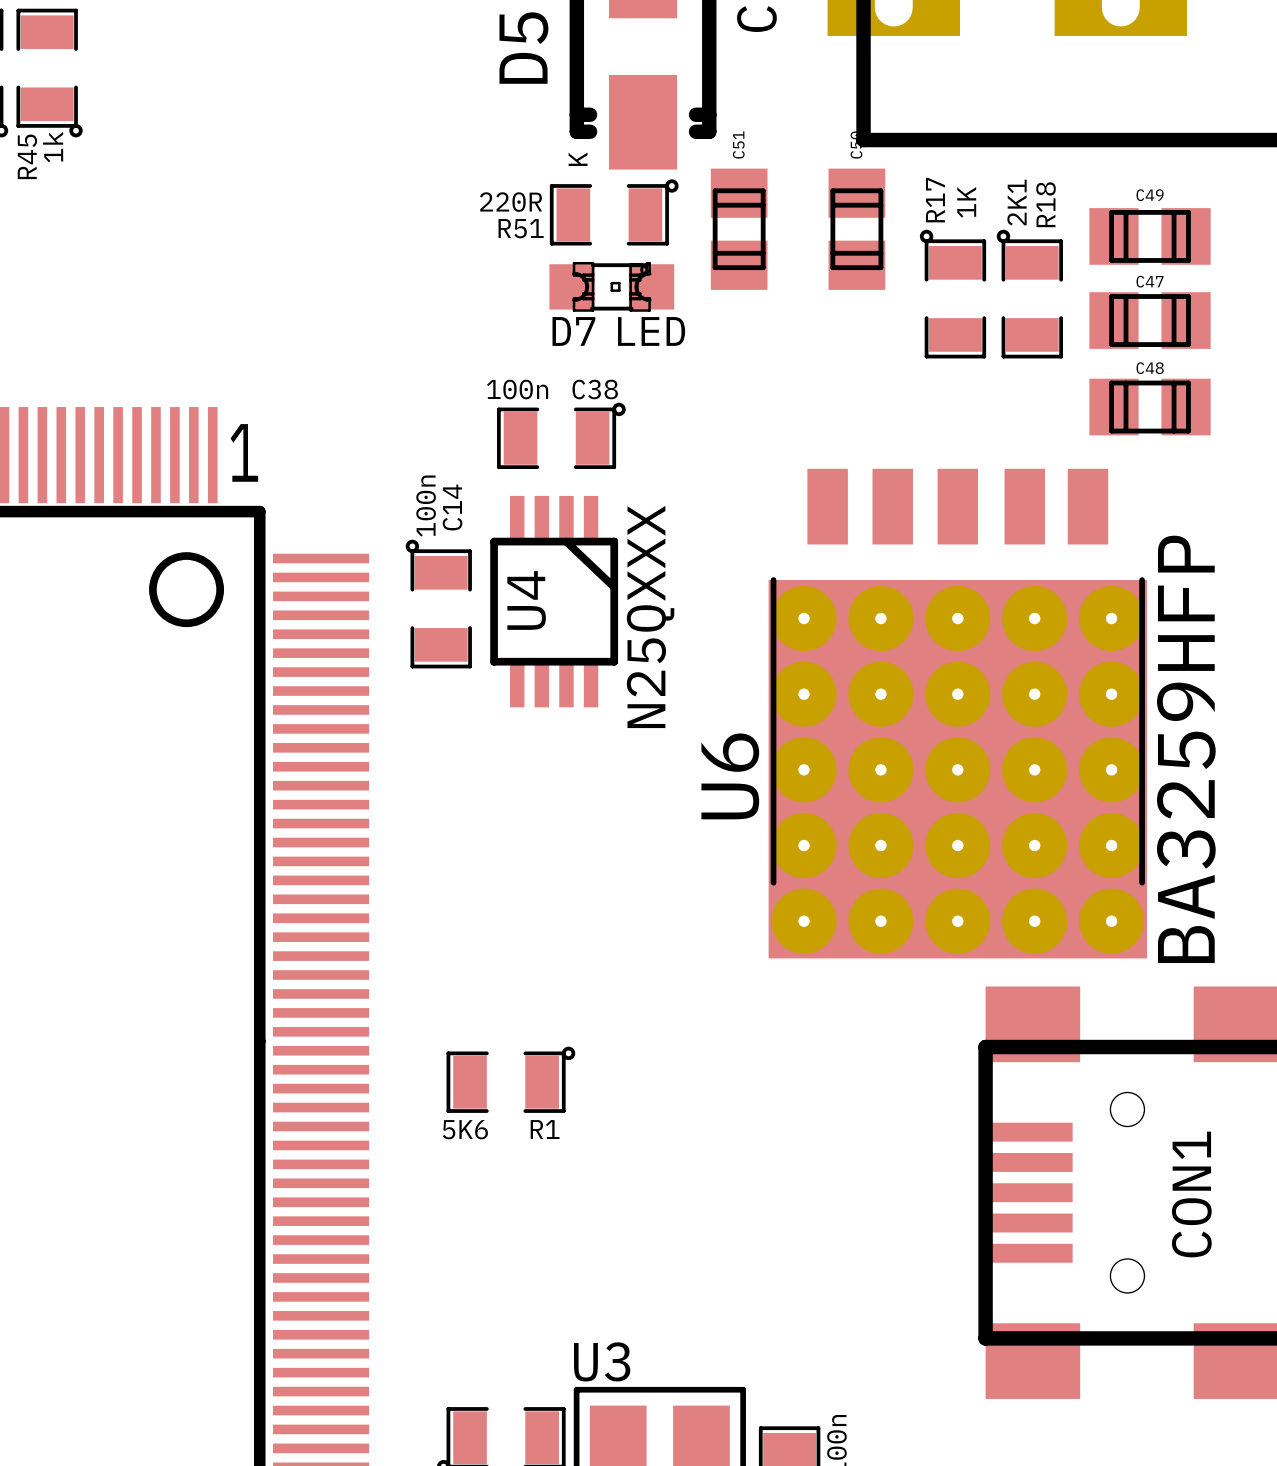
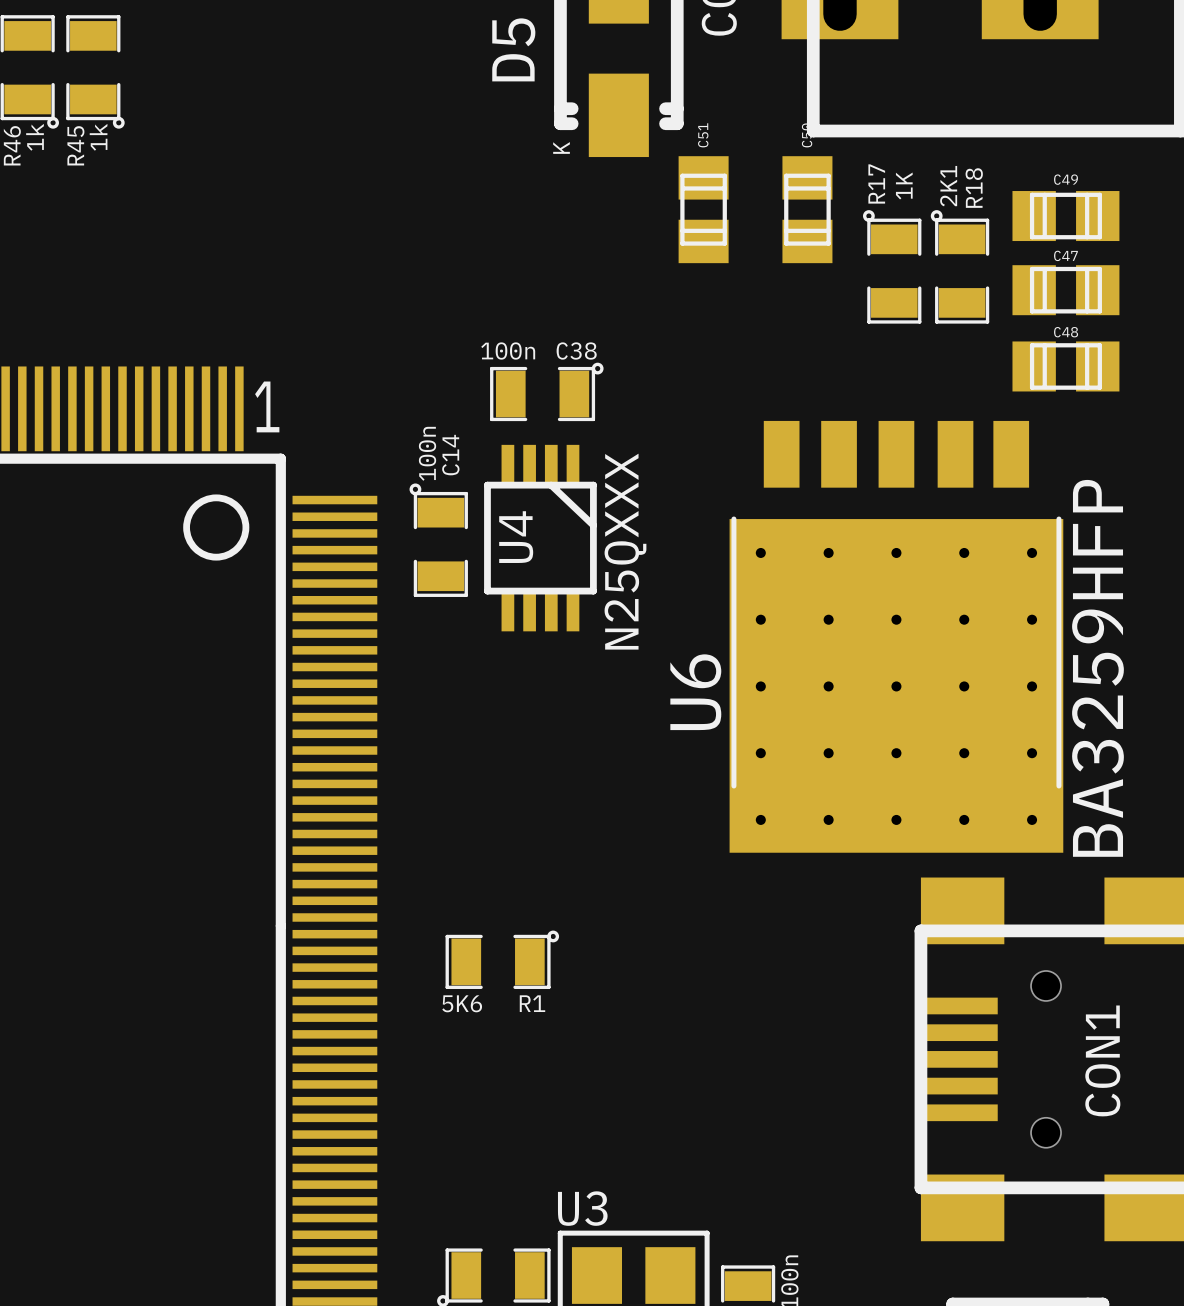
R51: 220R (614, 212) -> none
D7: LED (611, 286) -> none

